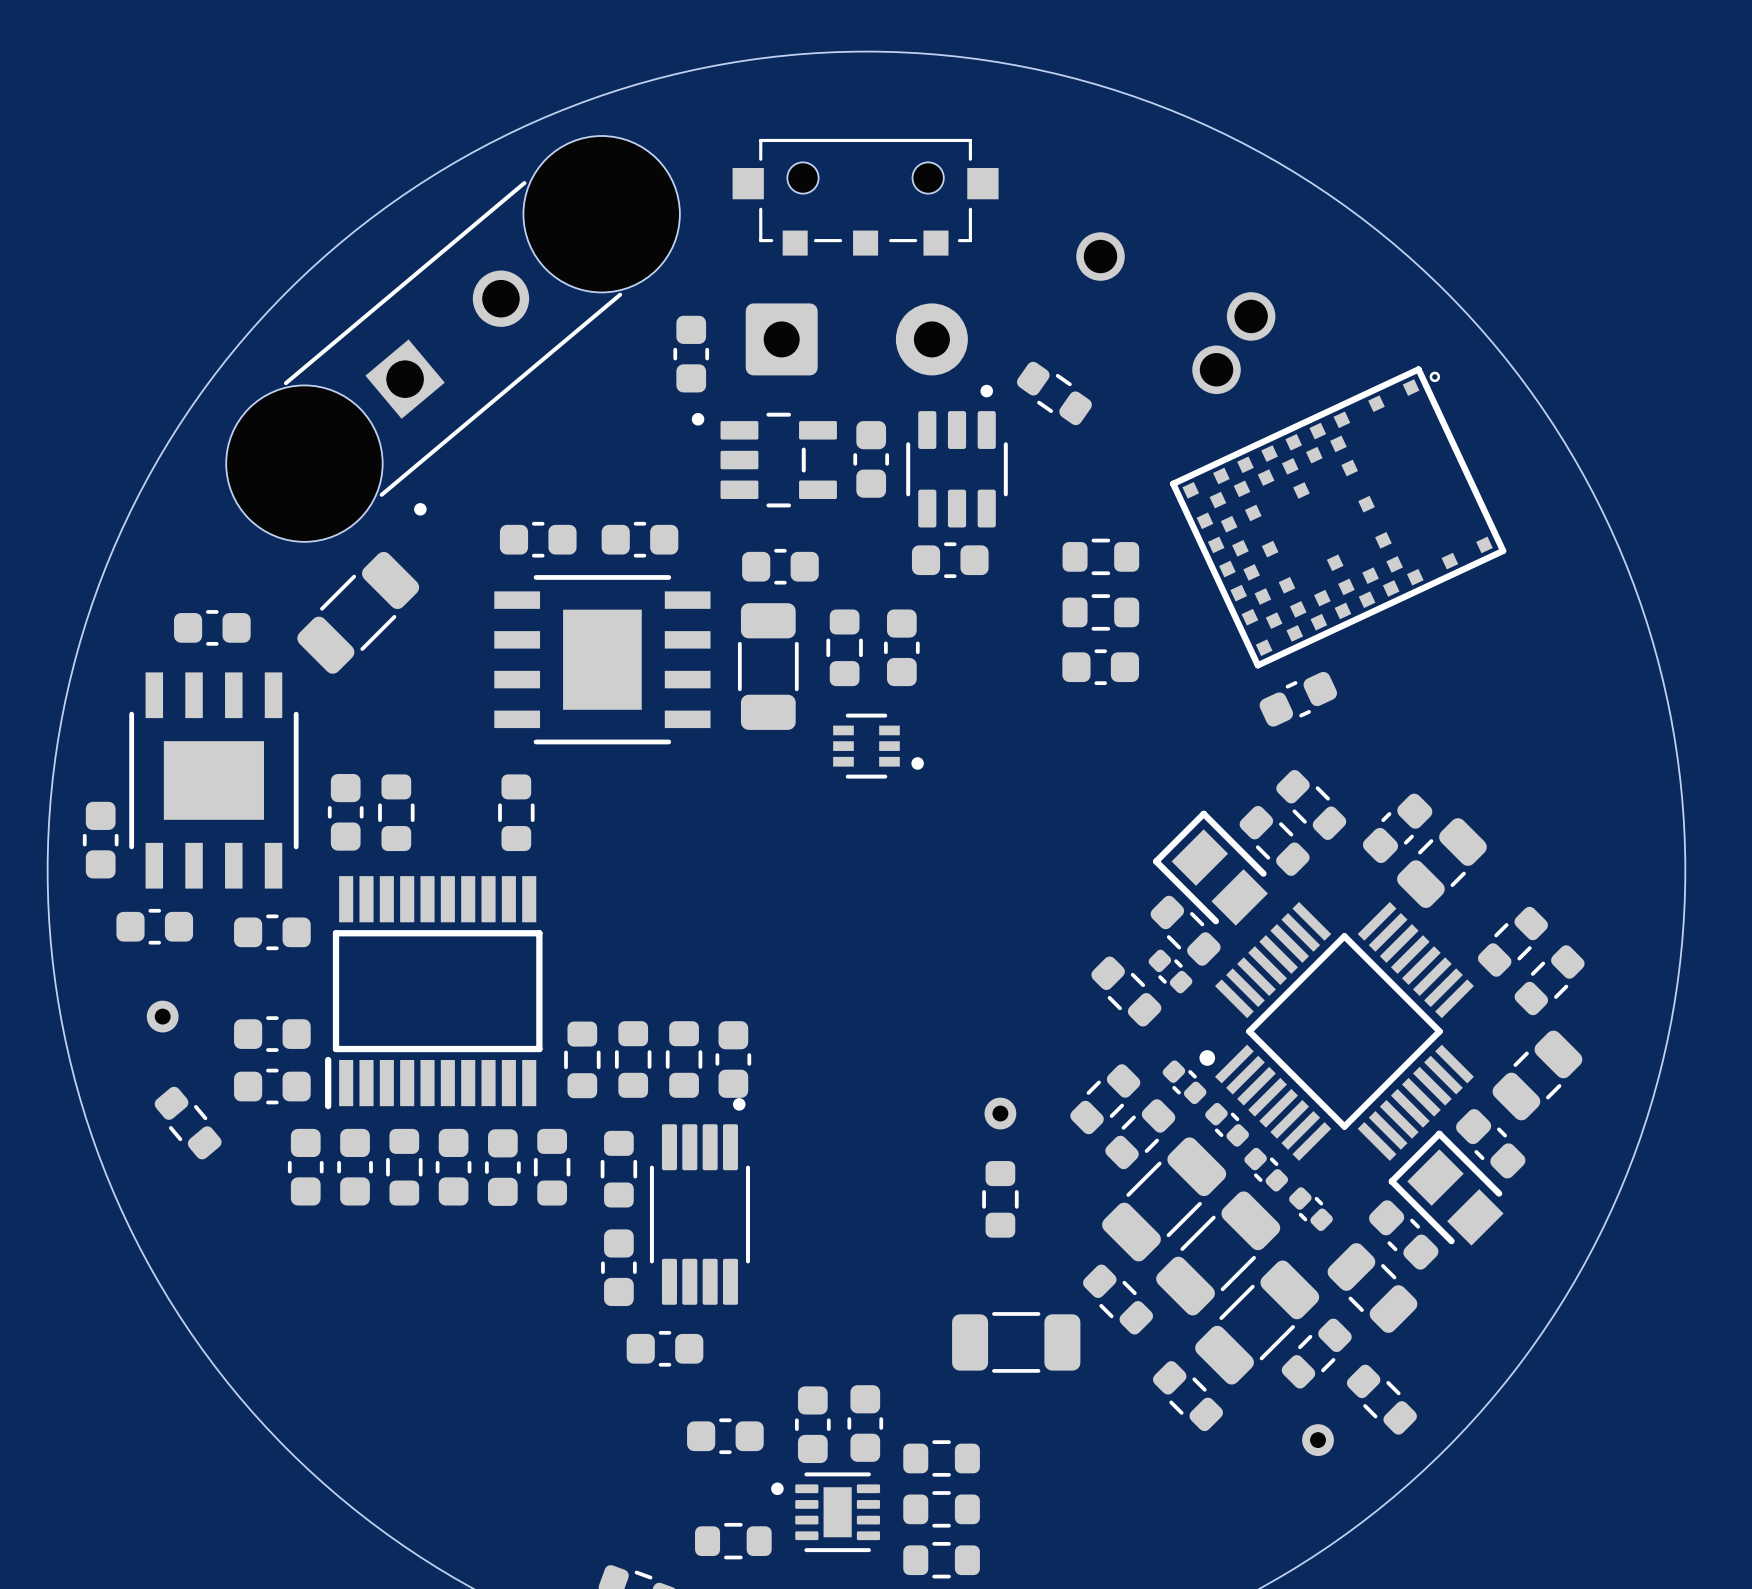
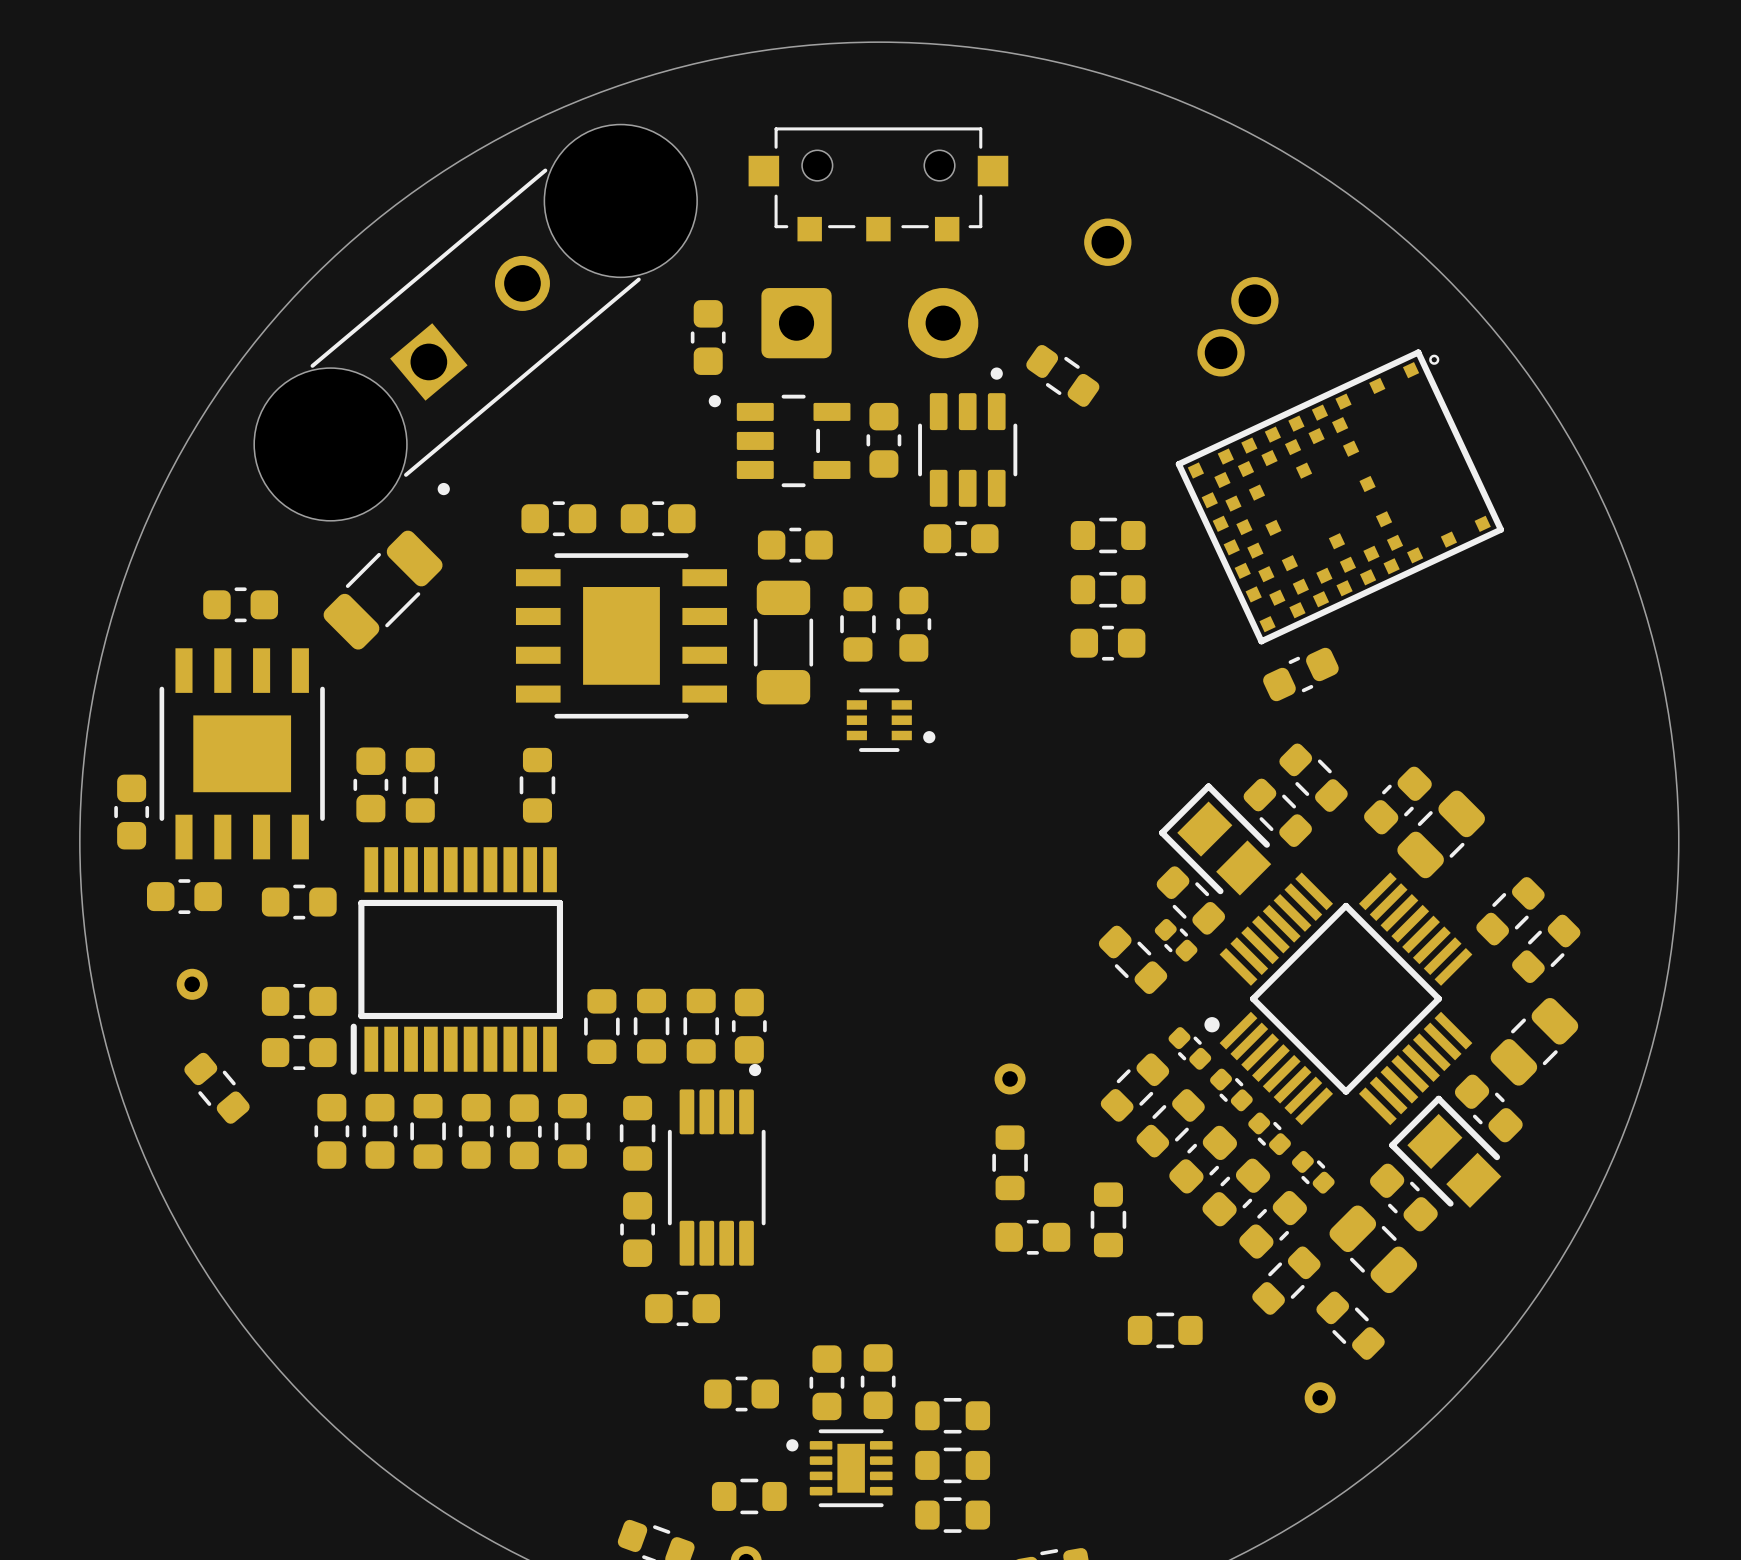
part: (1105, 1099) -> none
part: none -> (1134, 1087)
part: (1140, 1134) -> none
part: none -> (1170, 1123)
part: none -> (1203, 1159)
part: (1164, 1199) -> none
part: none -> (1236, 1192)
part: (1218, 1253) -> none
part: none -> (1108, 1219)
part: none -> (1273, 1224)
part: none -> (1032, 1237)
part: (1118, 1299) -> none
part: none -> (1286, 1280)
part: (1257, 1322) -> none
part: (1016, 1342) -> none
part: (1316, 1353) -> none
part: none -> (1350, 1325)
part: none -> (1165, 1330)
part: (1187, 1396) -> none
part: (1381, 1399) -> none

